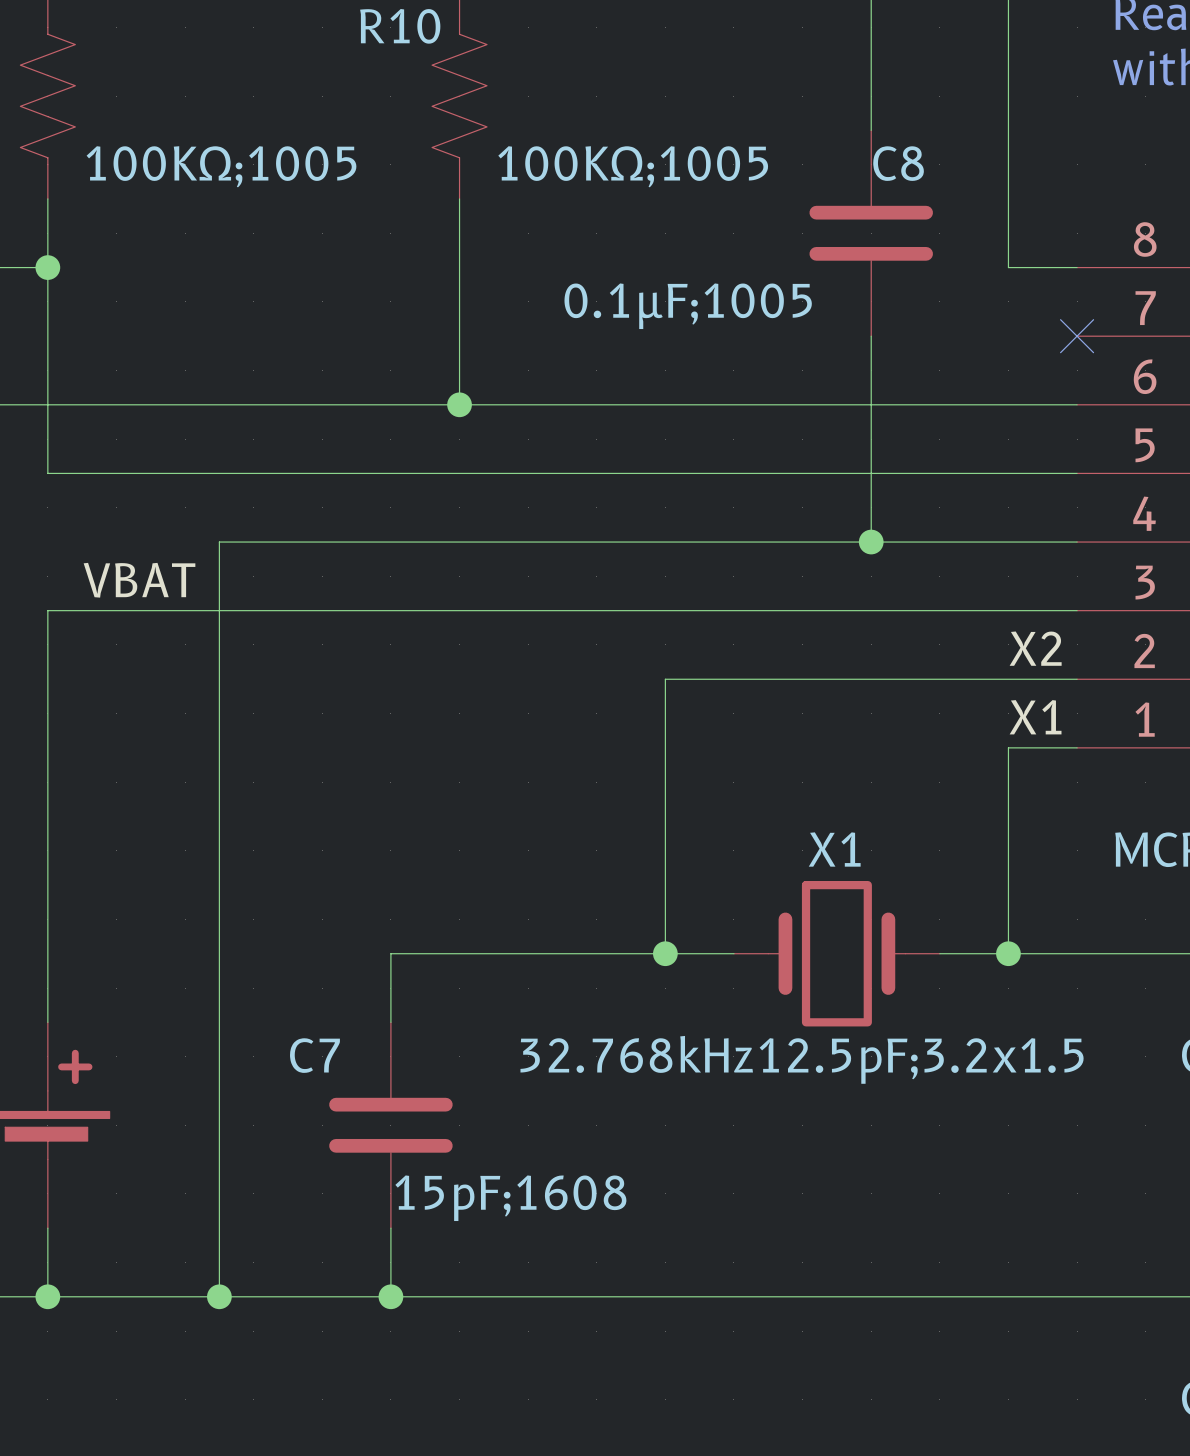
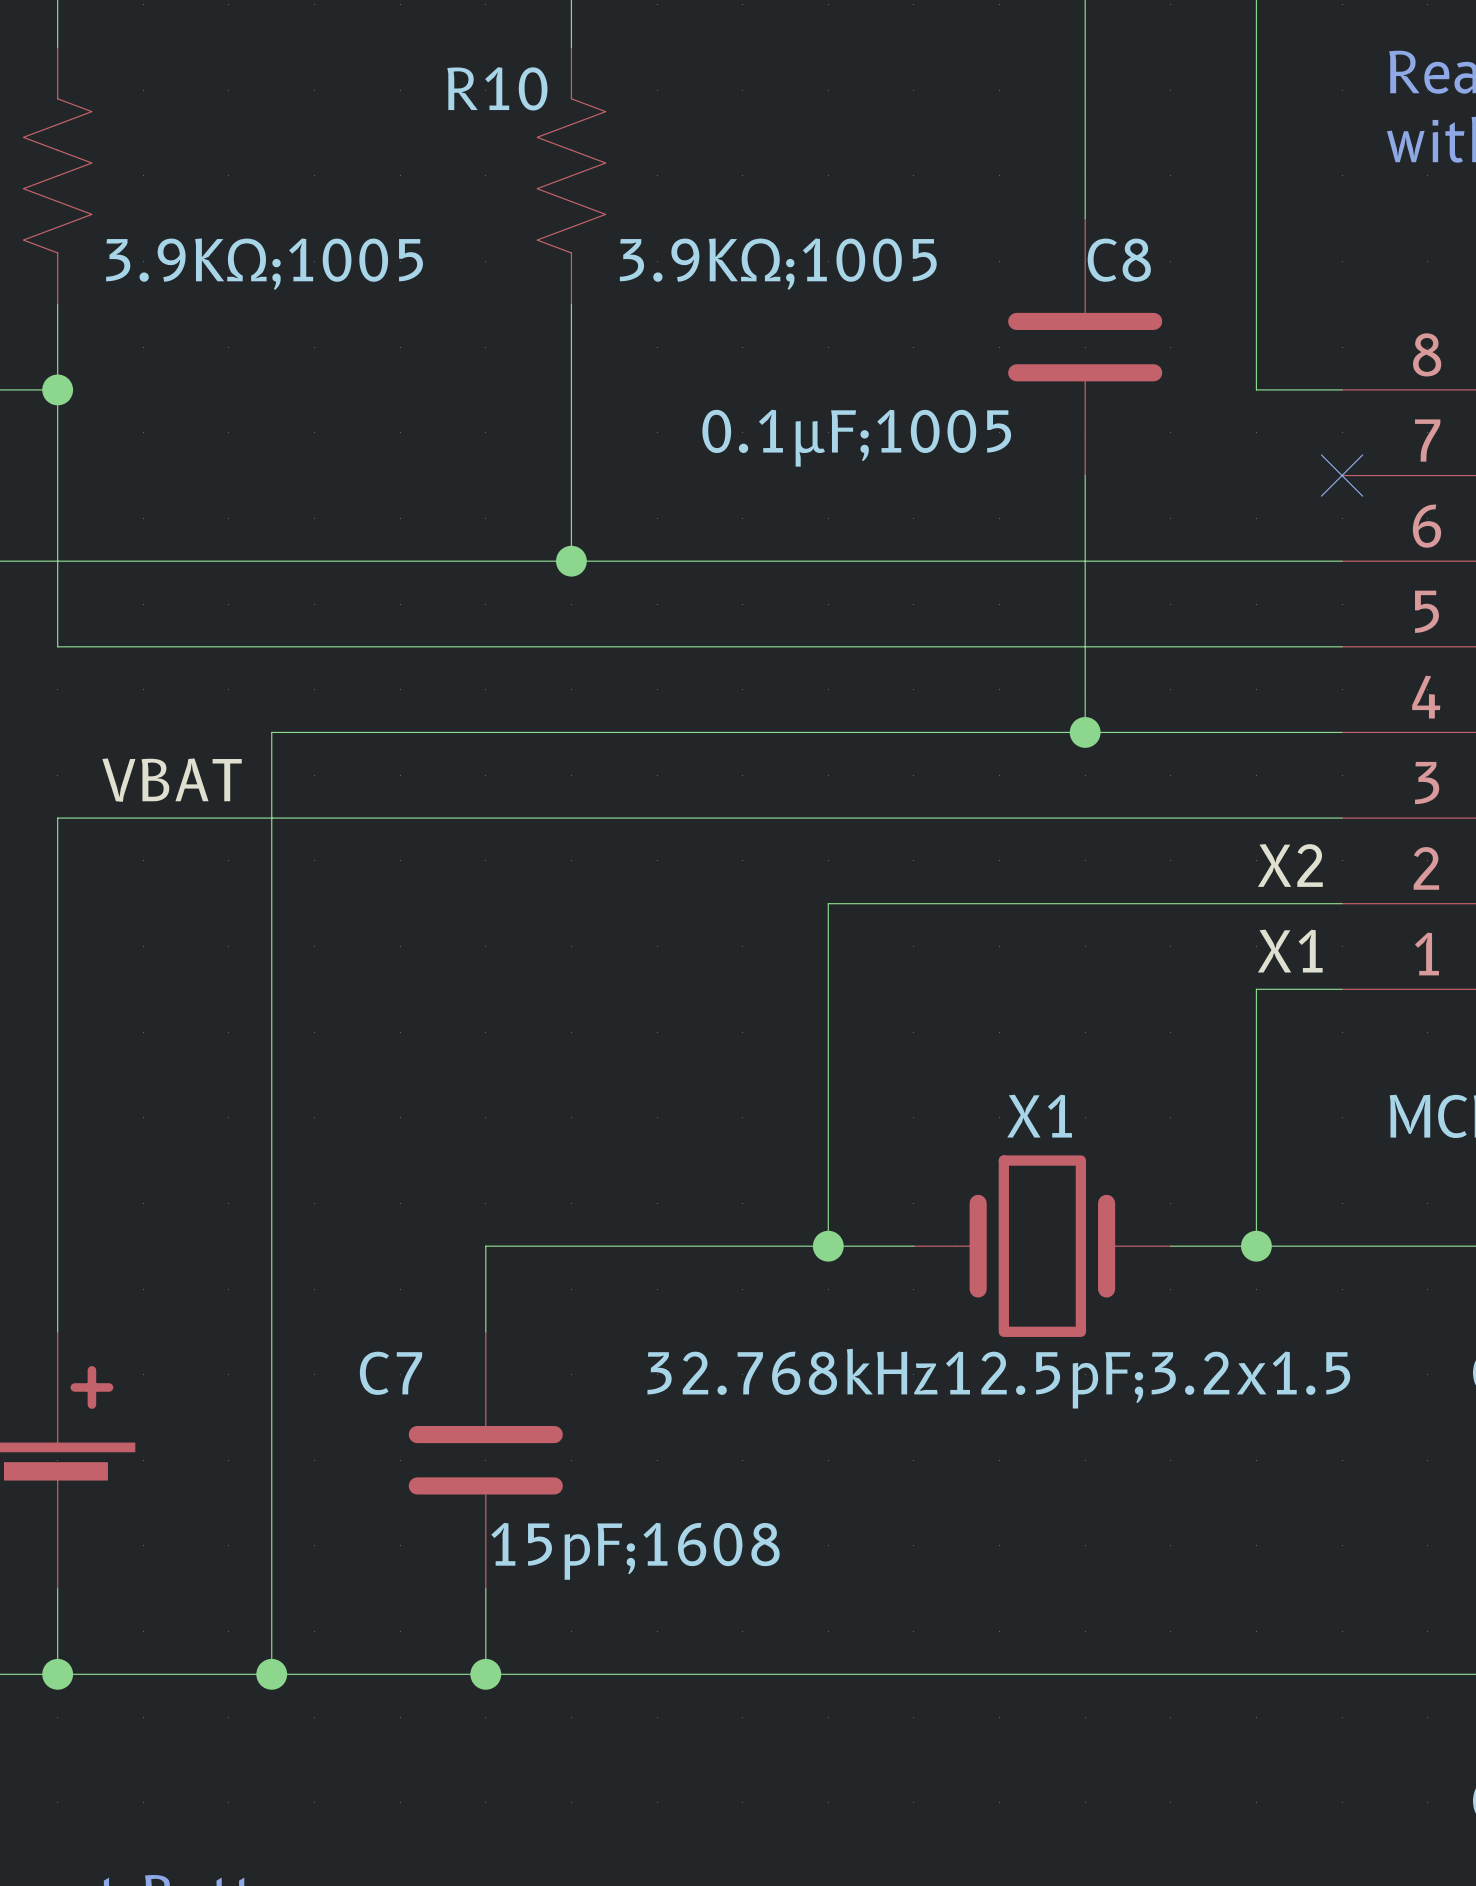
part value: 100KΩ;1005 (221, 166) -> 3.9KΩ;1005 (264, 264)
R10 value: 100KΩ;1005 (633, 166) -> 3.9KΩ;1005 (778, 264)

